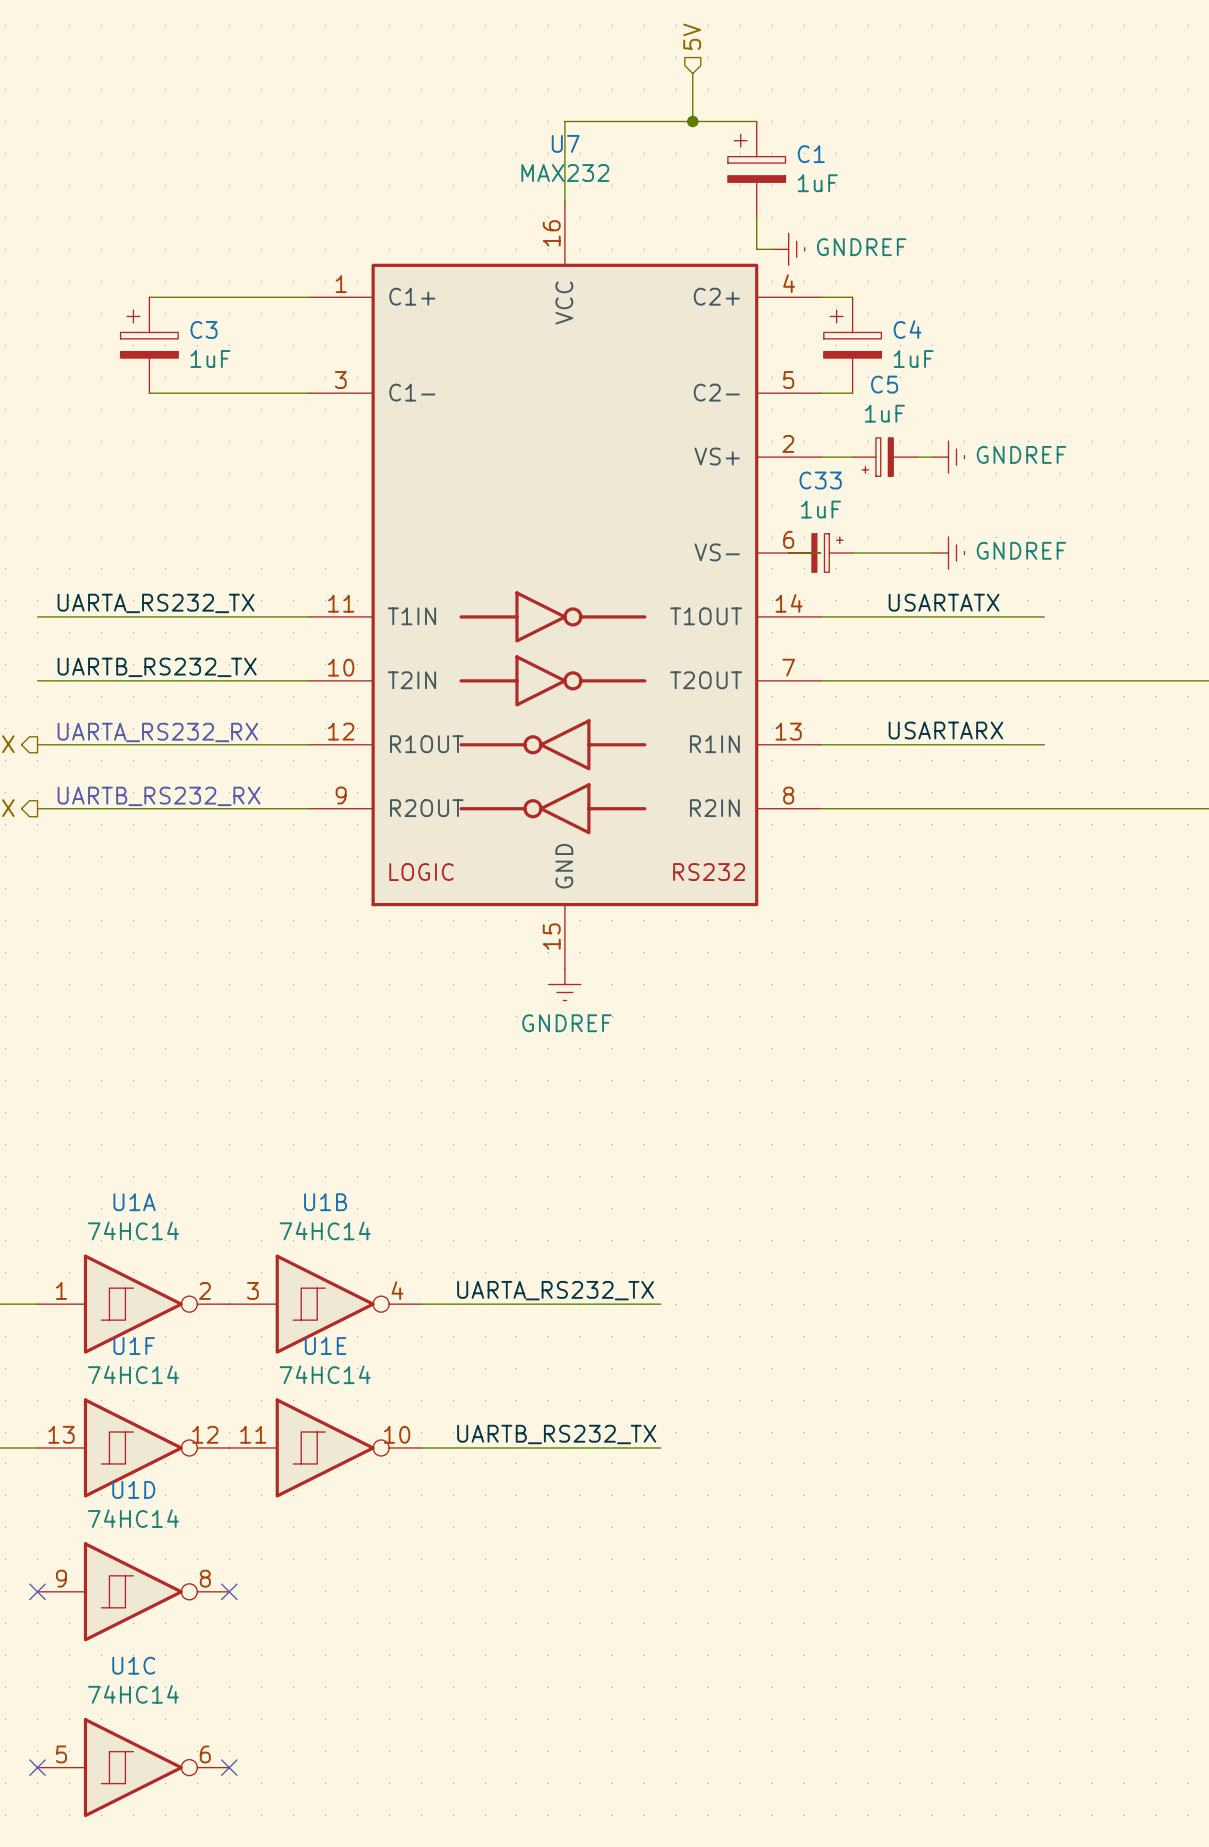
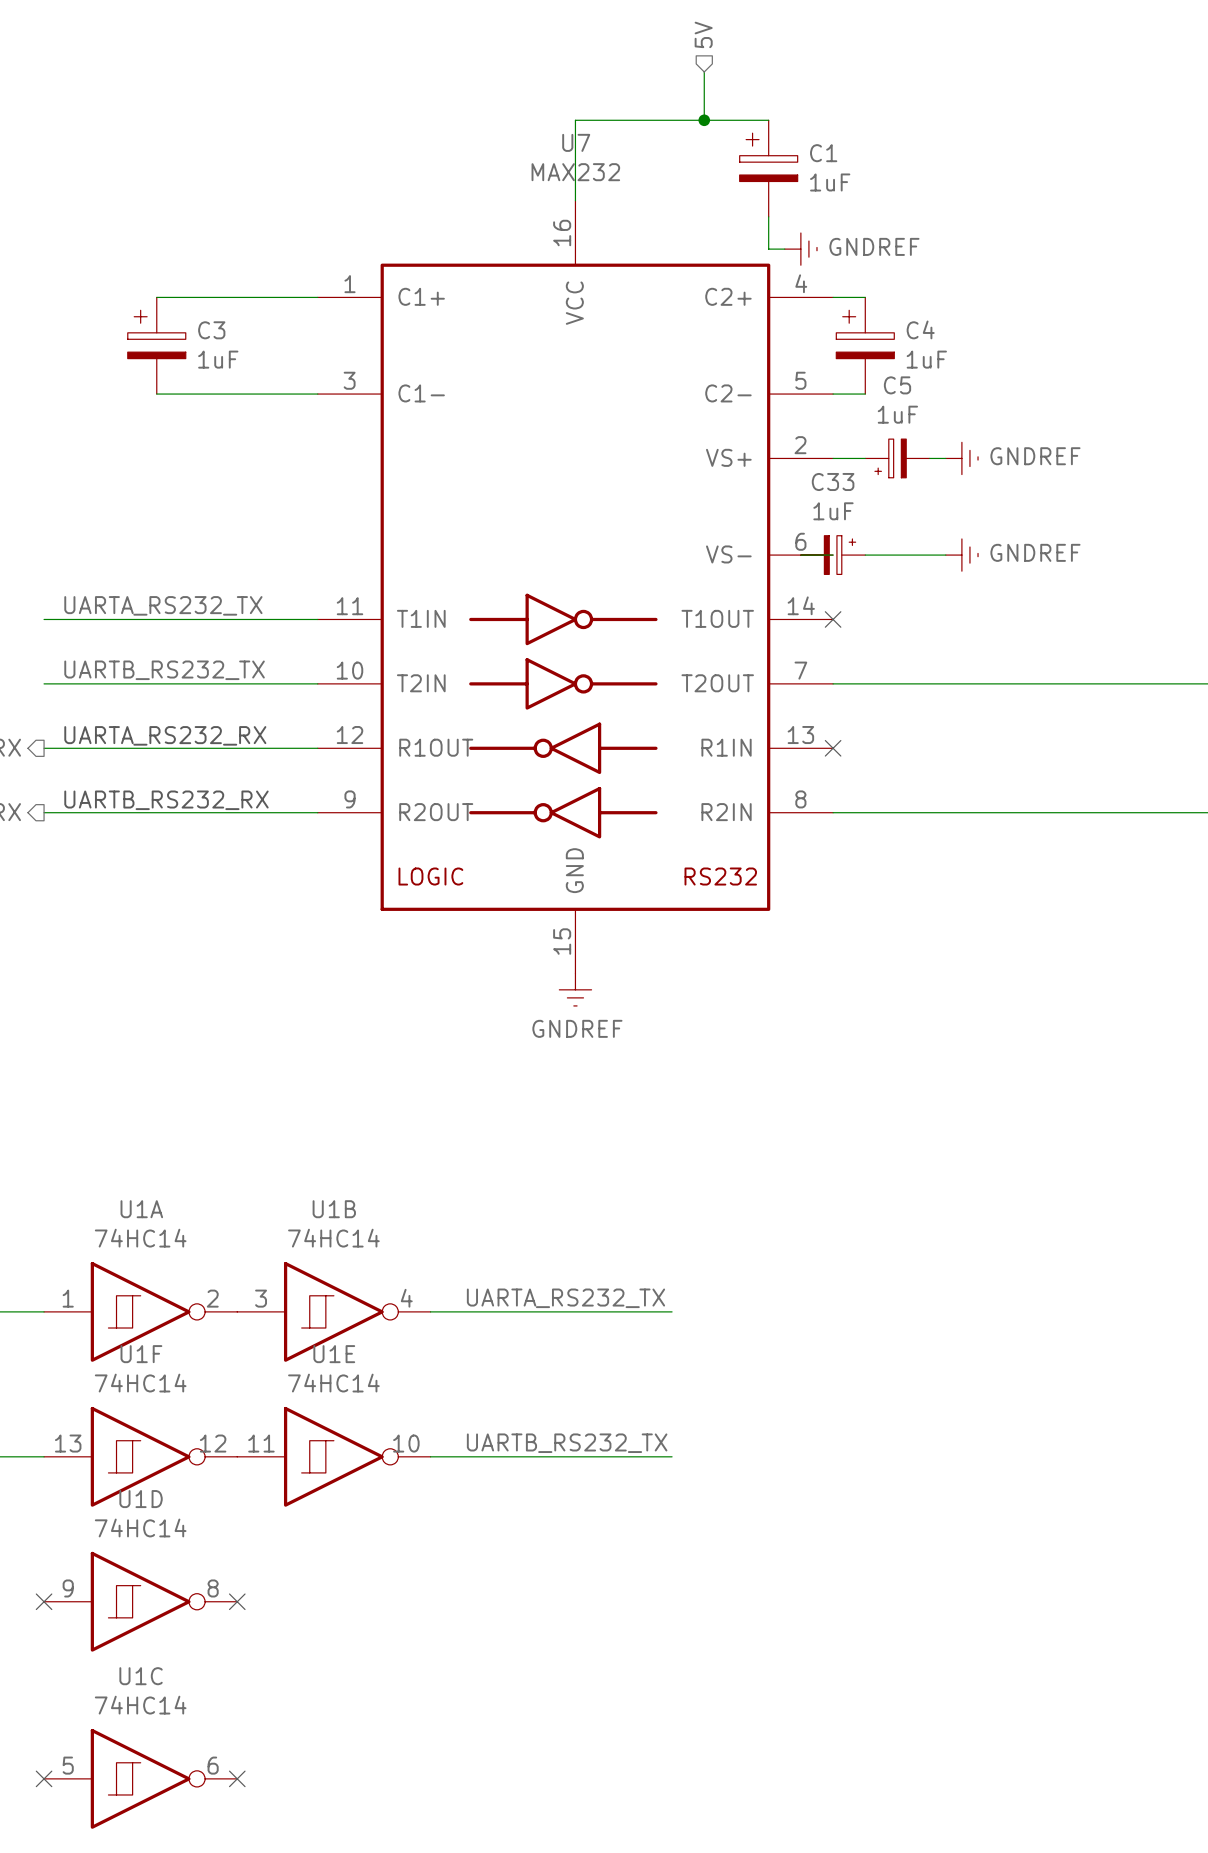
label: USARTATX (944, 602) -> none
wire: (820, 616) (1044, 616) -> none
no-connect mark: none -> (833, 619)
label: USARTARX (945, 730) -> none
wire: (820, 744) (1044, 744) -> none
no-connect mark: none -> (833, 748)

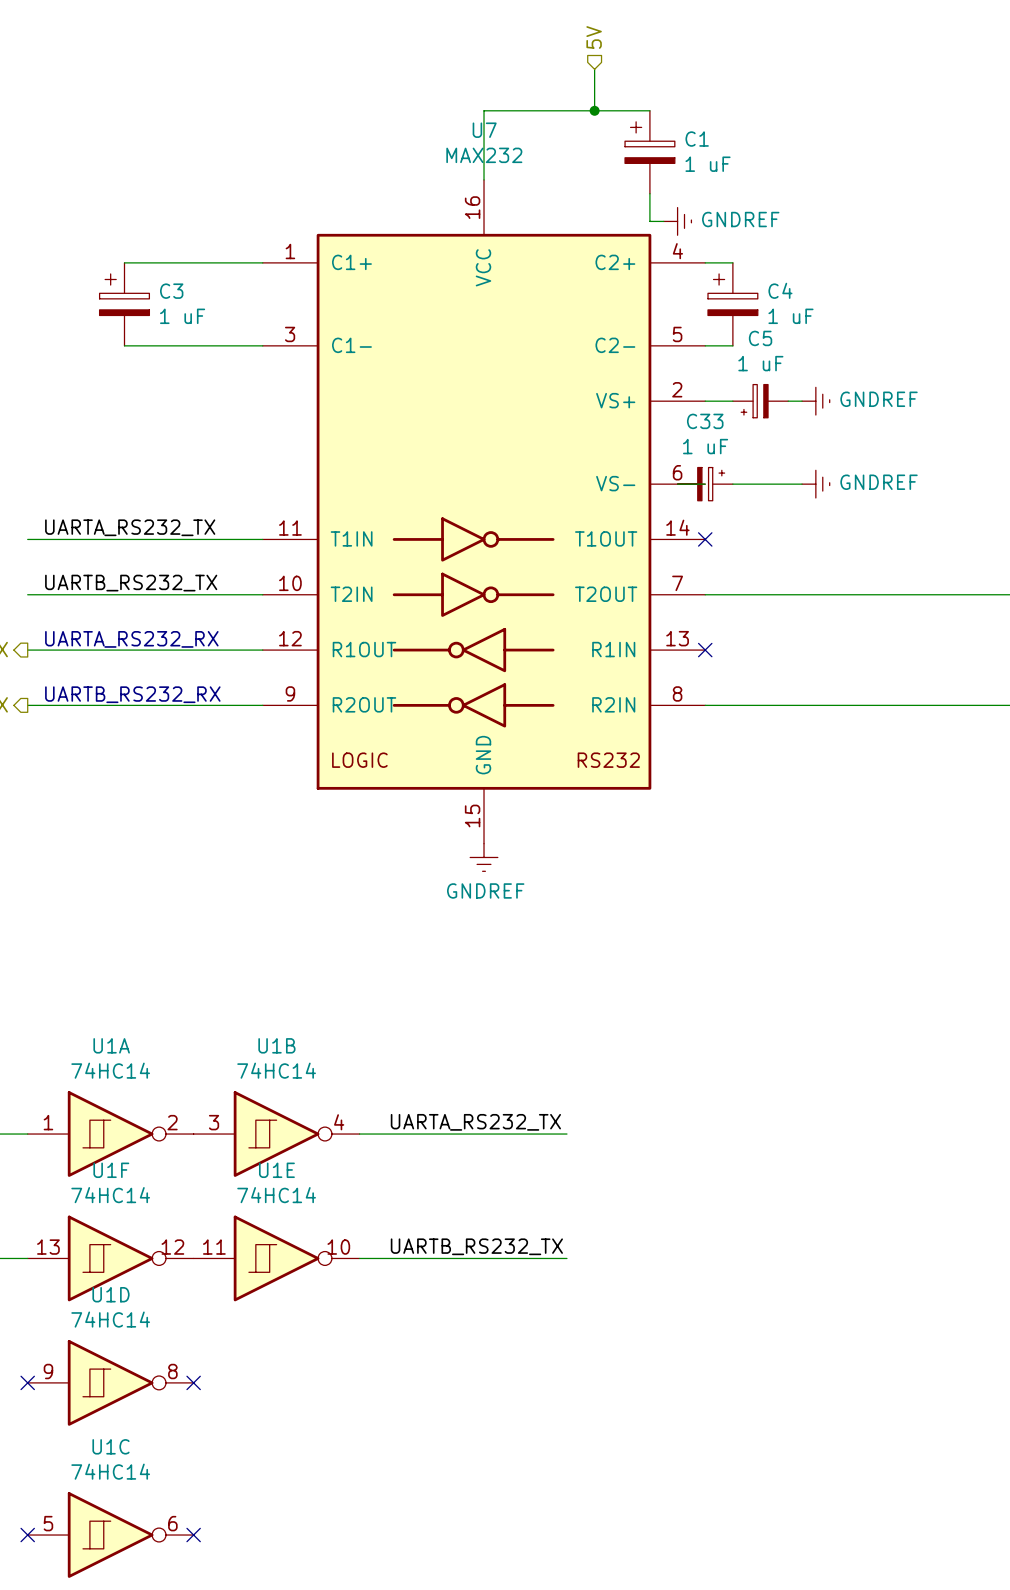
C1 value: 1uF (830, 182) -> 1 uF (708, 164)
C3 value: 1uF (218, 359) -> 1 uF (182, 316)
C4 value: 1uF (926, 359) -> 1 uF (790, 316)
C5 value: 1uF (897, 414) -> 1 uF (760, 363)
C33 value: 1uF (833, 511) -> 1 uF (705, 446)

